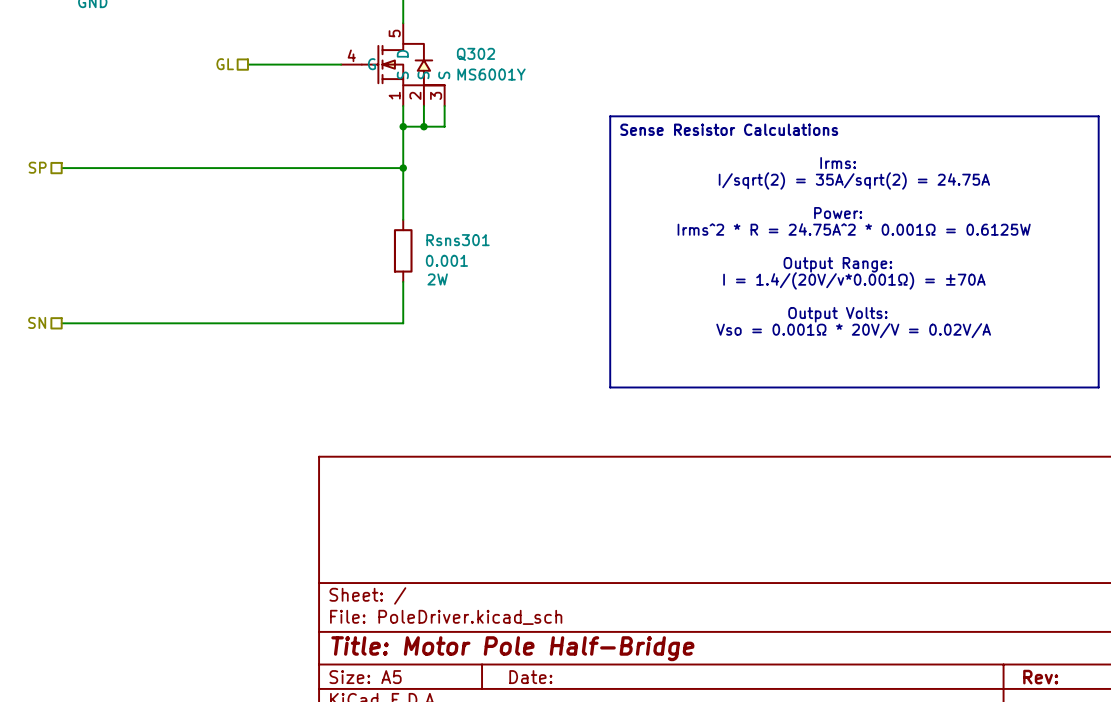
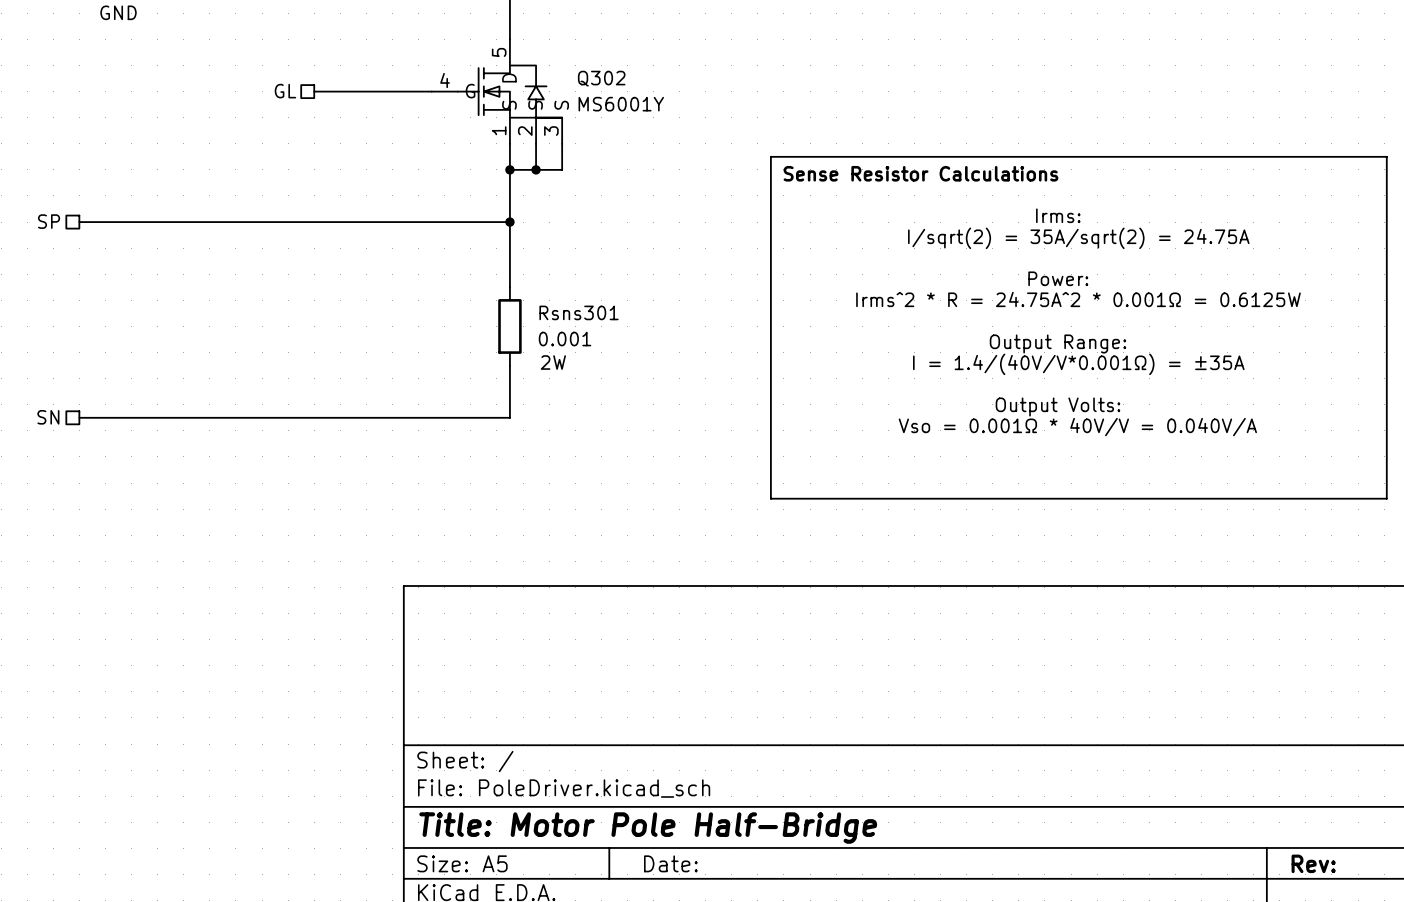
text: I = 1.4/(20V/v*0.001Ω) = ±70A (854, 280) -> I = 1.4/(40V/V*0.001Ω) = ±35A (1078, 364)
text: Vso = 0.001Ω * 20V/V = 0.02V/A (853, 330) -> Vso = 0.001Ω * 40V/V = 0.040V/A (1077, 427)

